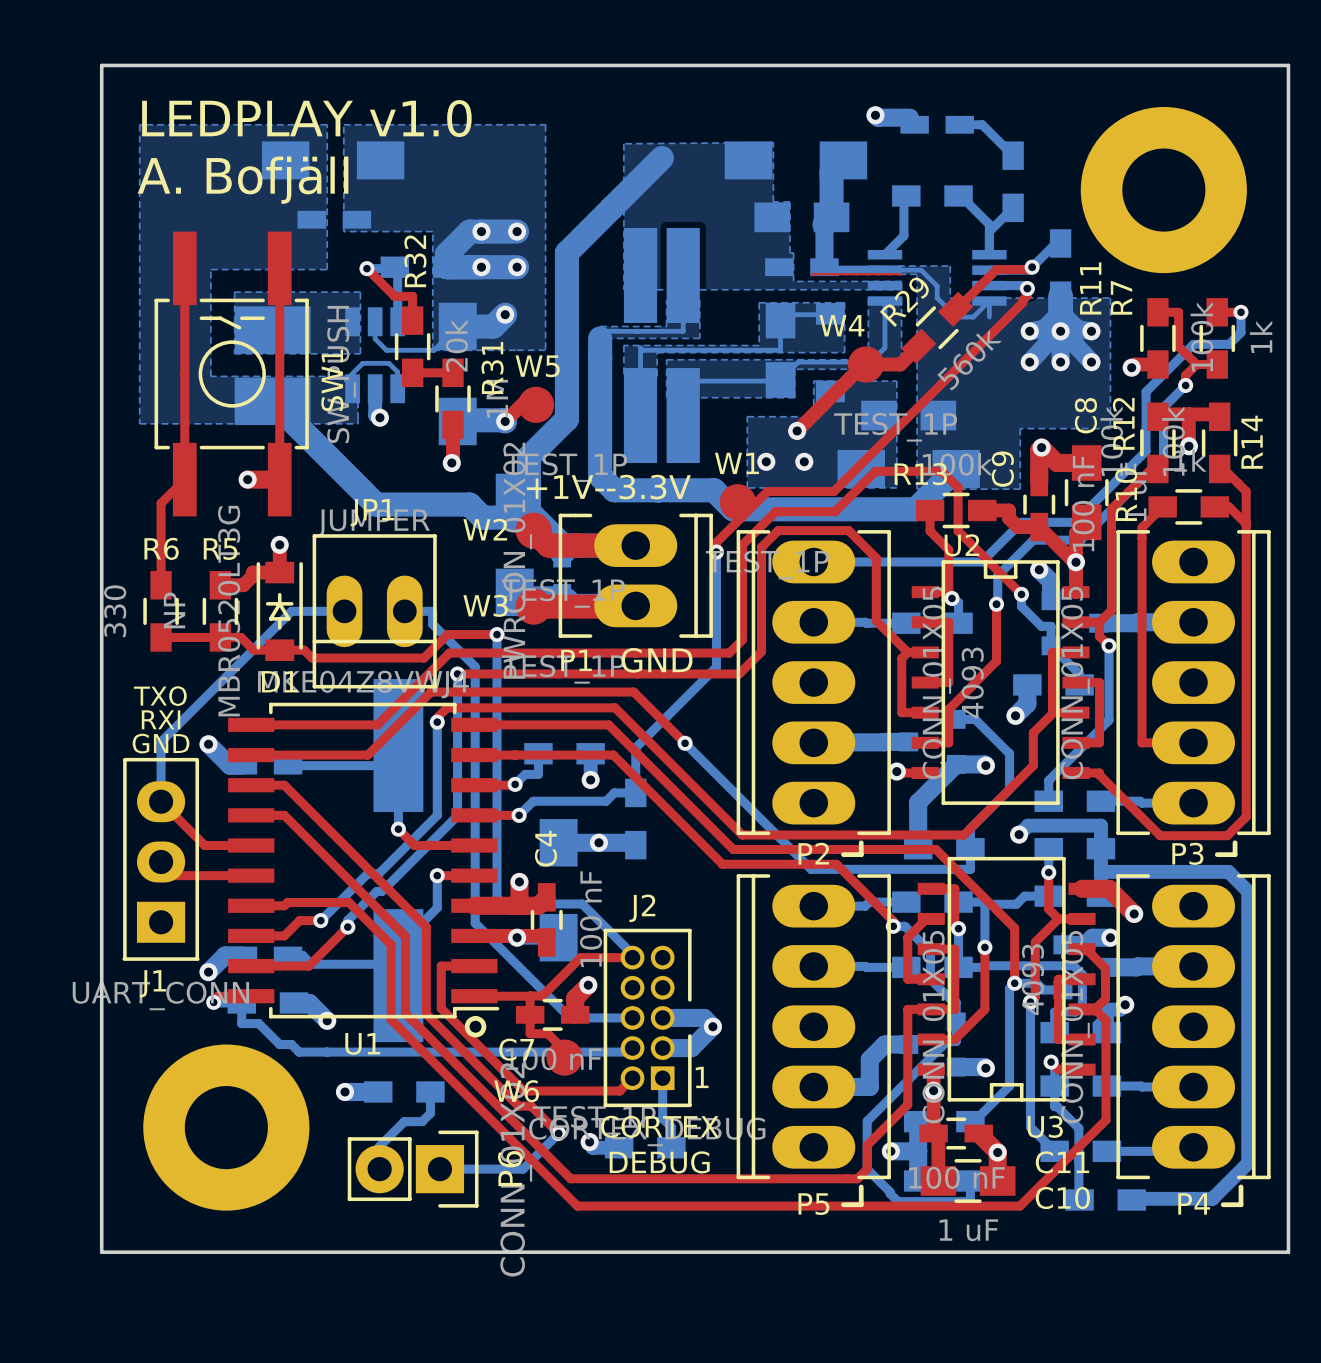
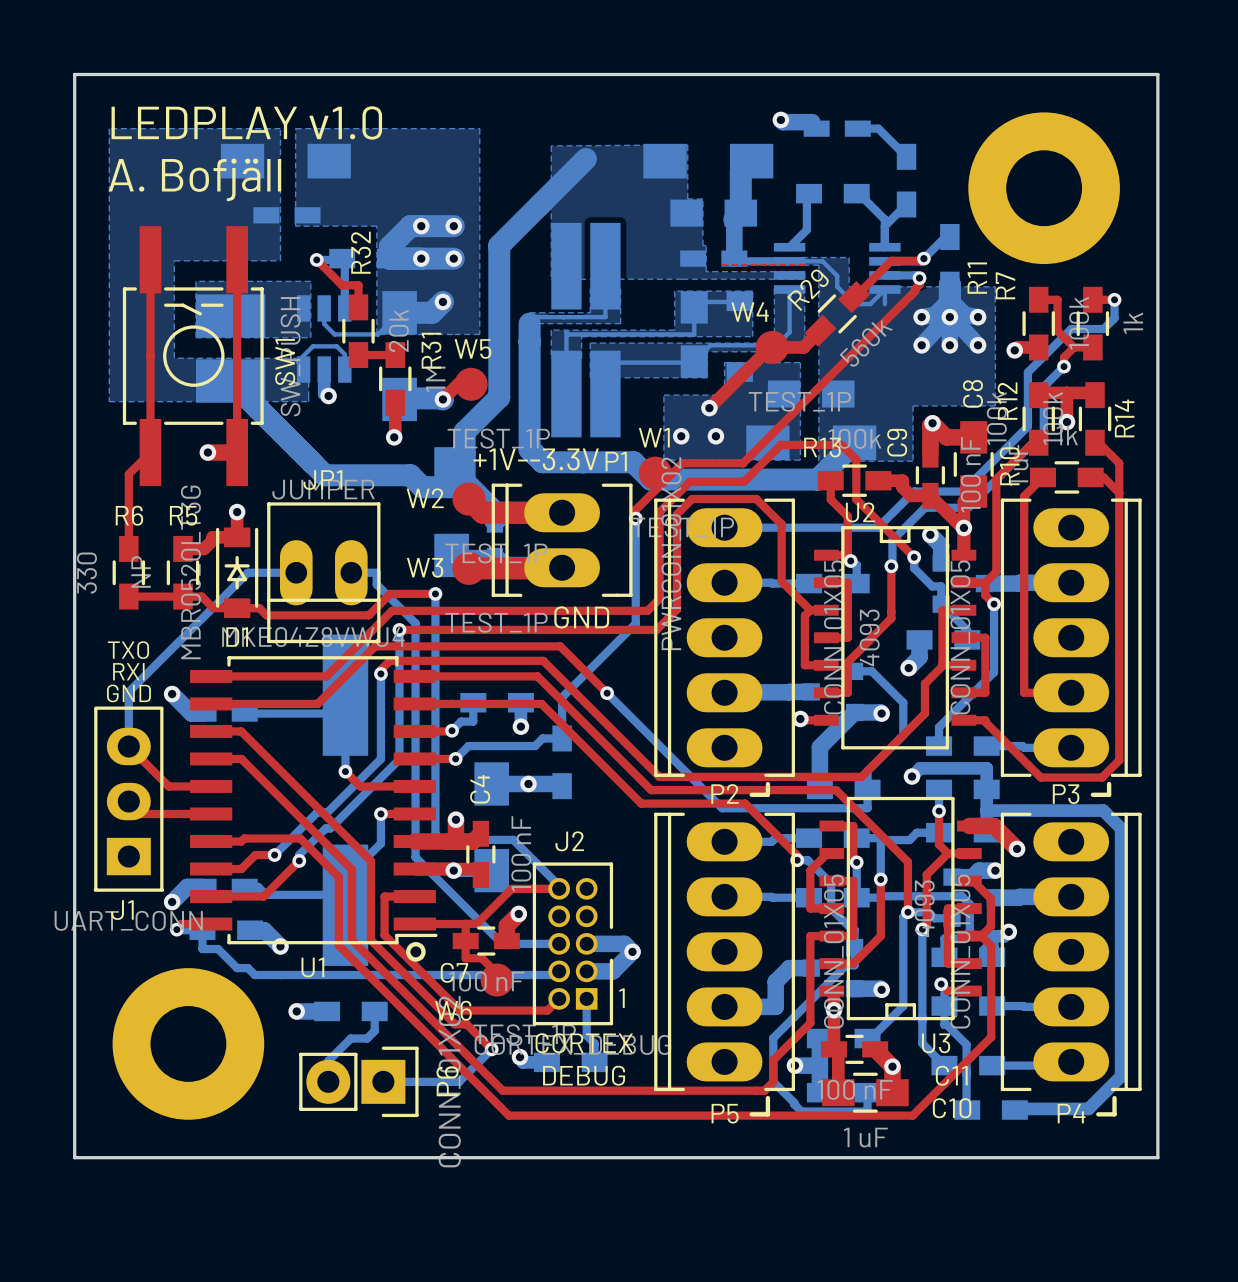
P1 rotation: 0° (635, 575) -> 180° (562, 540)

